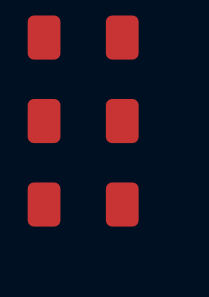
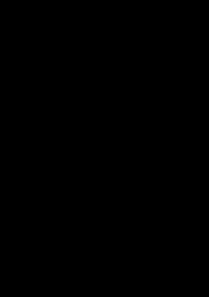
part: (83, 37) -> none
part: (83, 121) -> none
part: (83, 204) -> none

